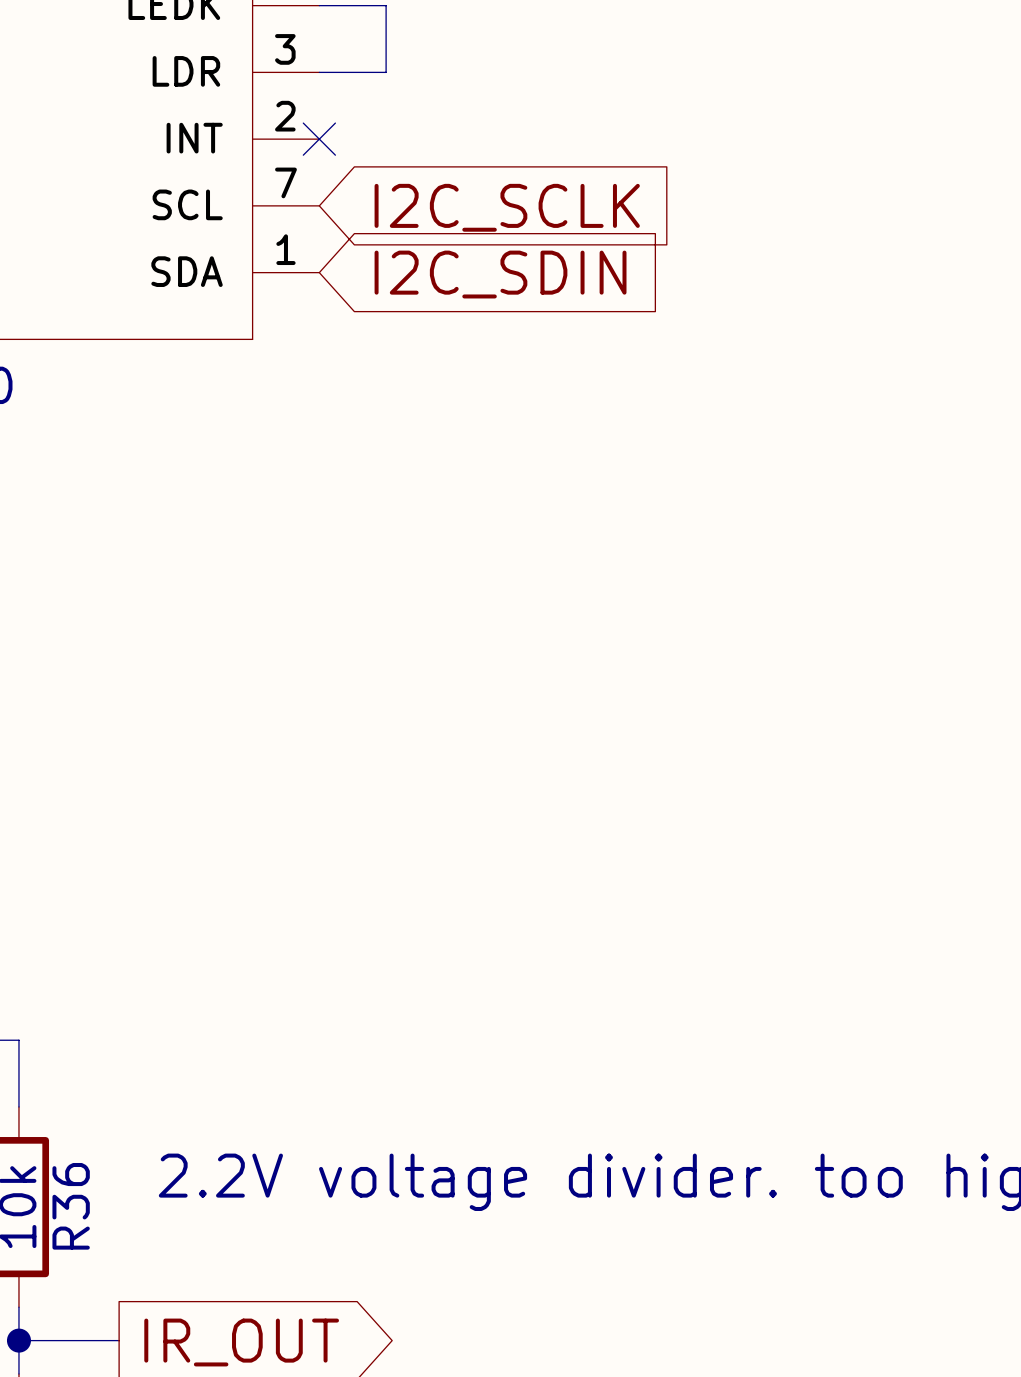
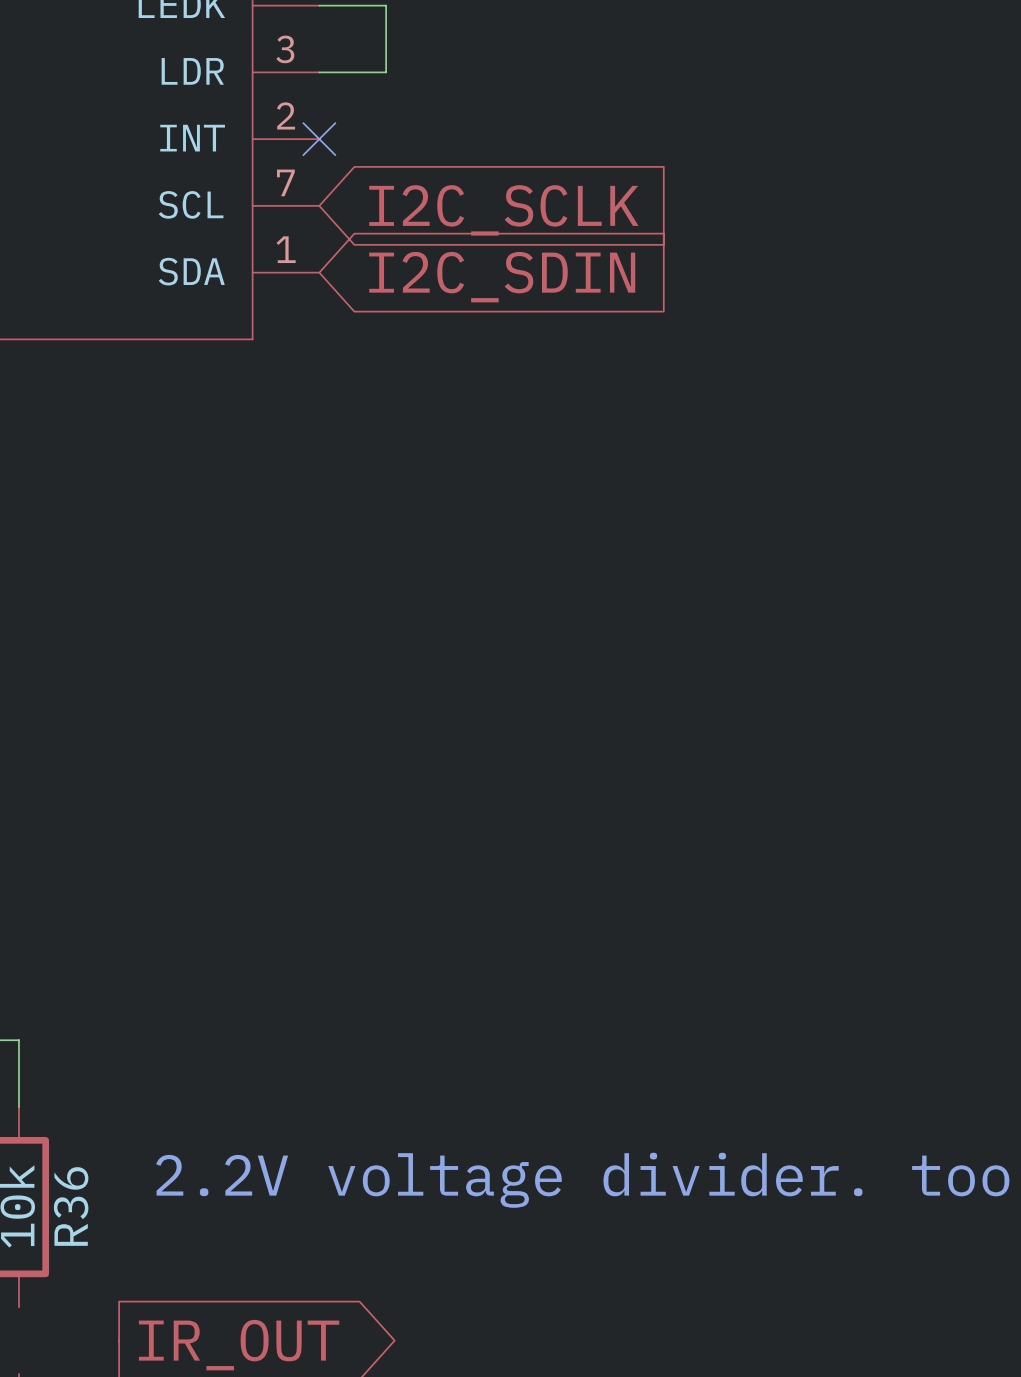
wire: (18, 1307) (18, 1373) -> none
wire: (18, 1340) (119, 1340) -> none
junction: (18, 1340) -> none

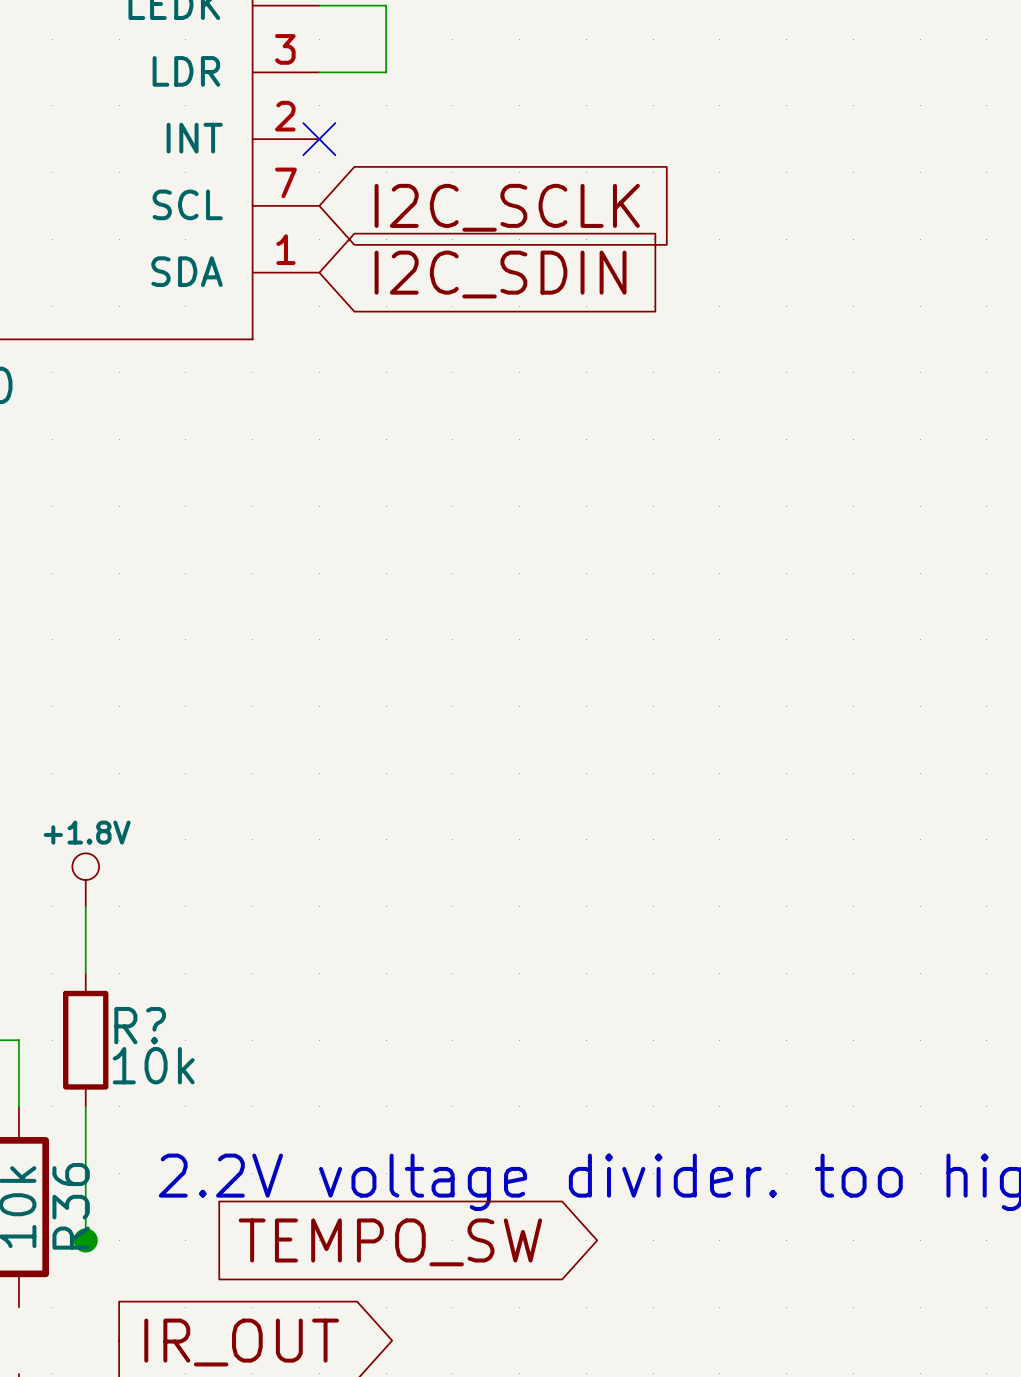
power symbol: none -> +1.8V (85, 880)
wire: none -> (85, 906) (85, 973)
R?: none -> 10k (85, 1040)
wire: none -> (85, 1106) (85, 1240)
junction: none -> (85, 1240)
global label: none -> TEMPO_SW (390, 1242)

